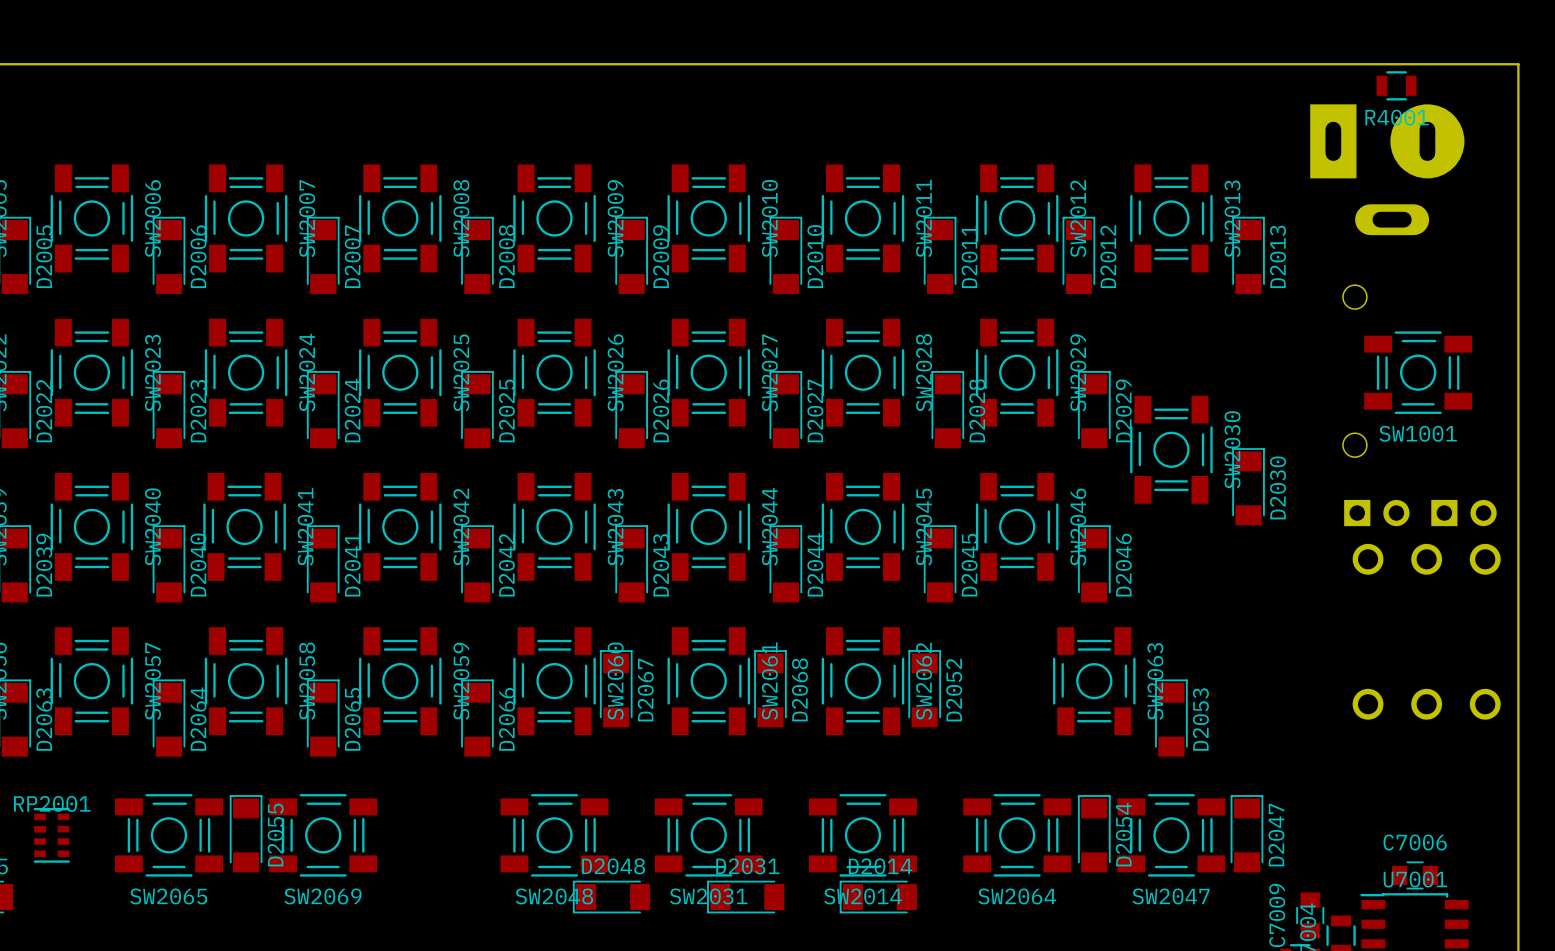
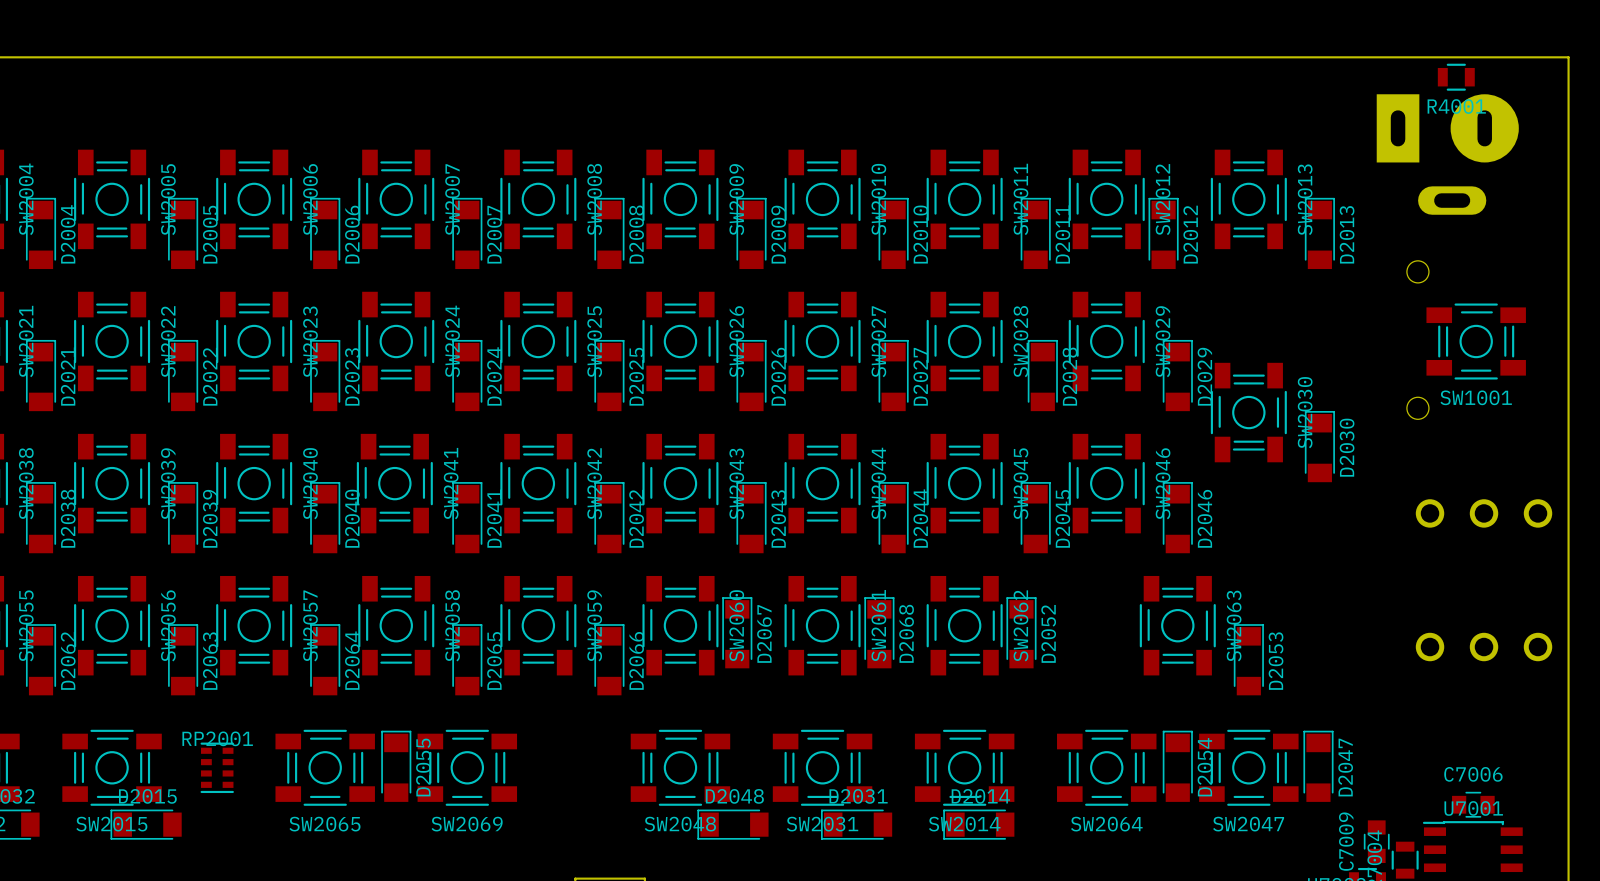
part: (1376, 513) -> none
part: (1463, 513) -> none

